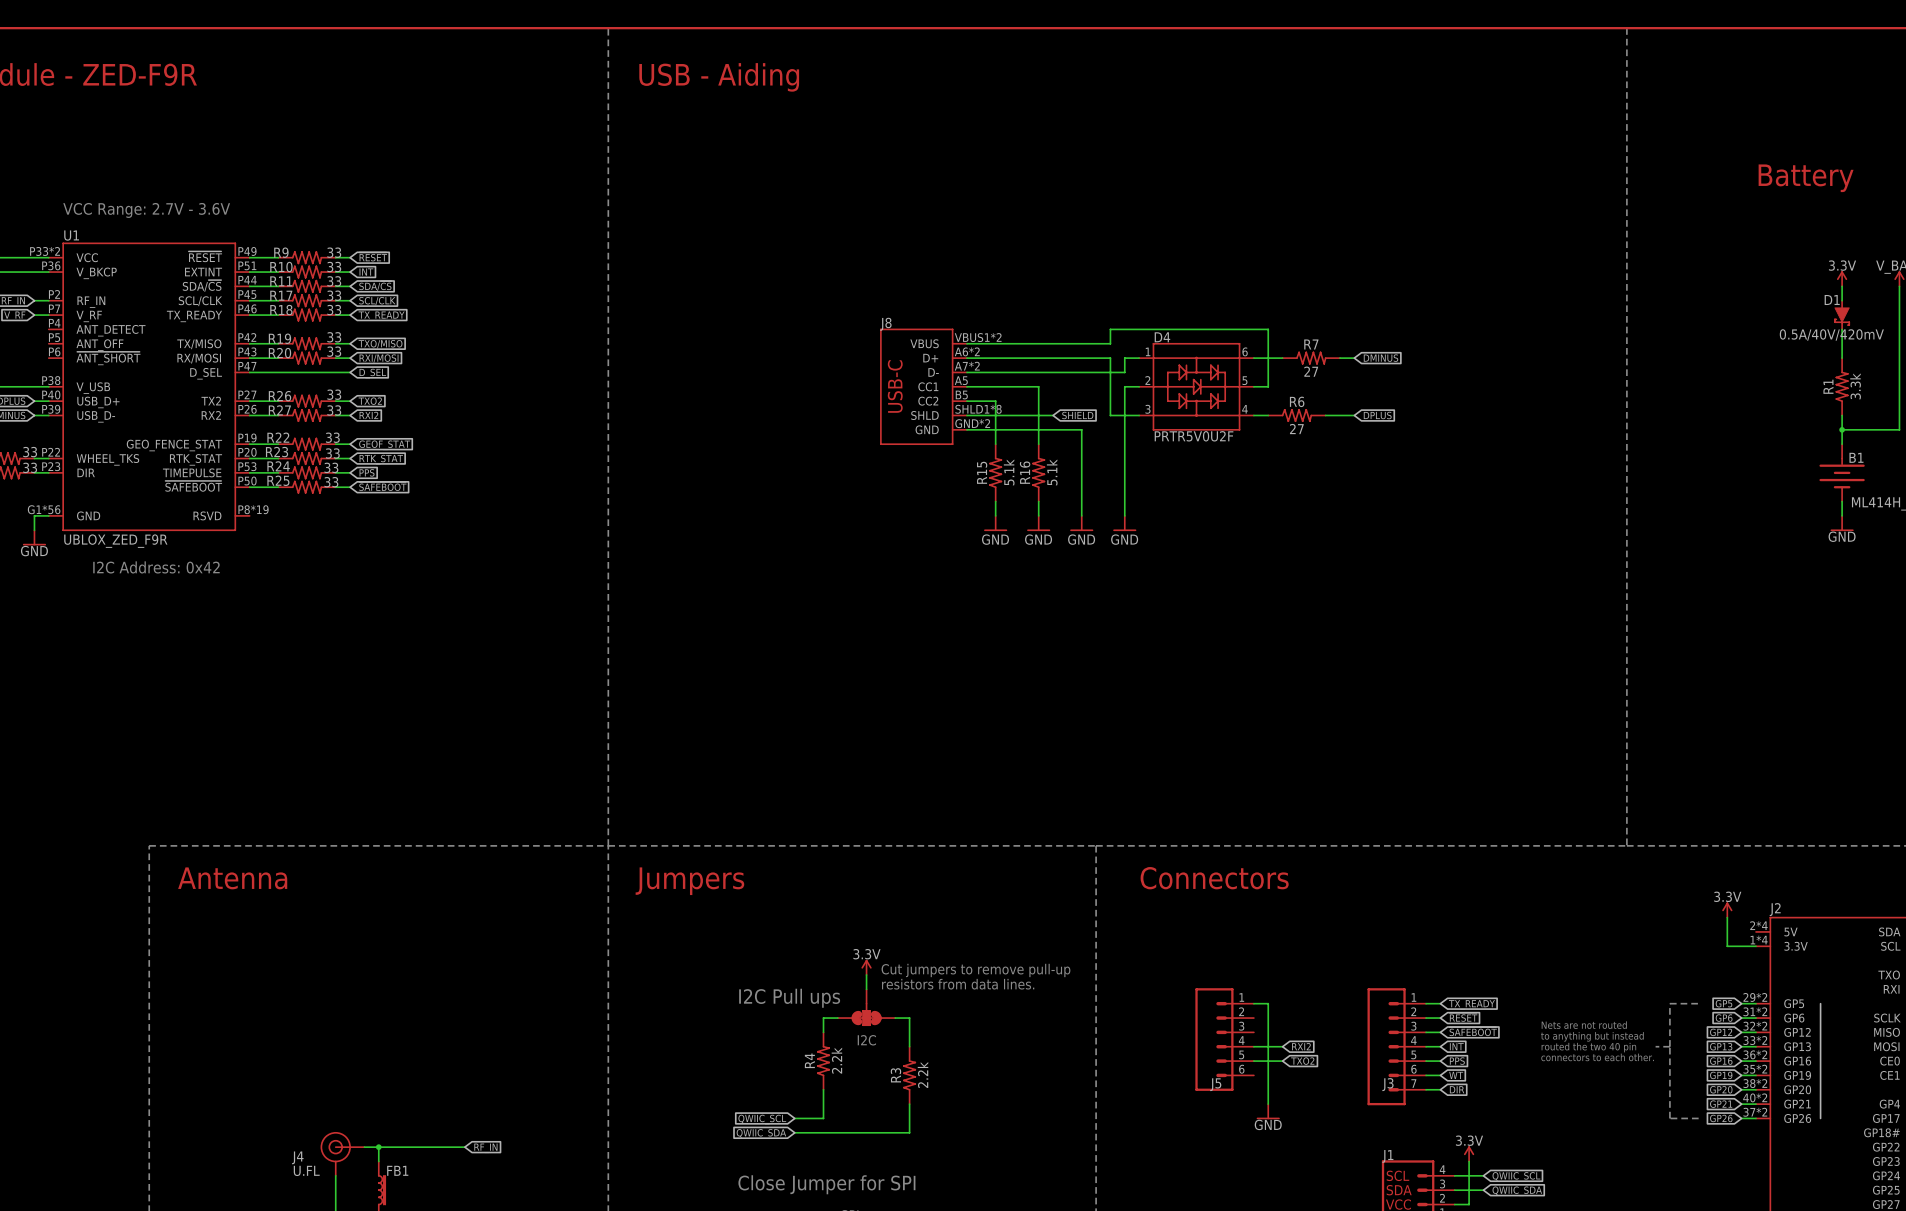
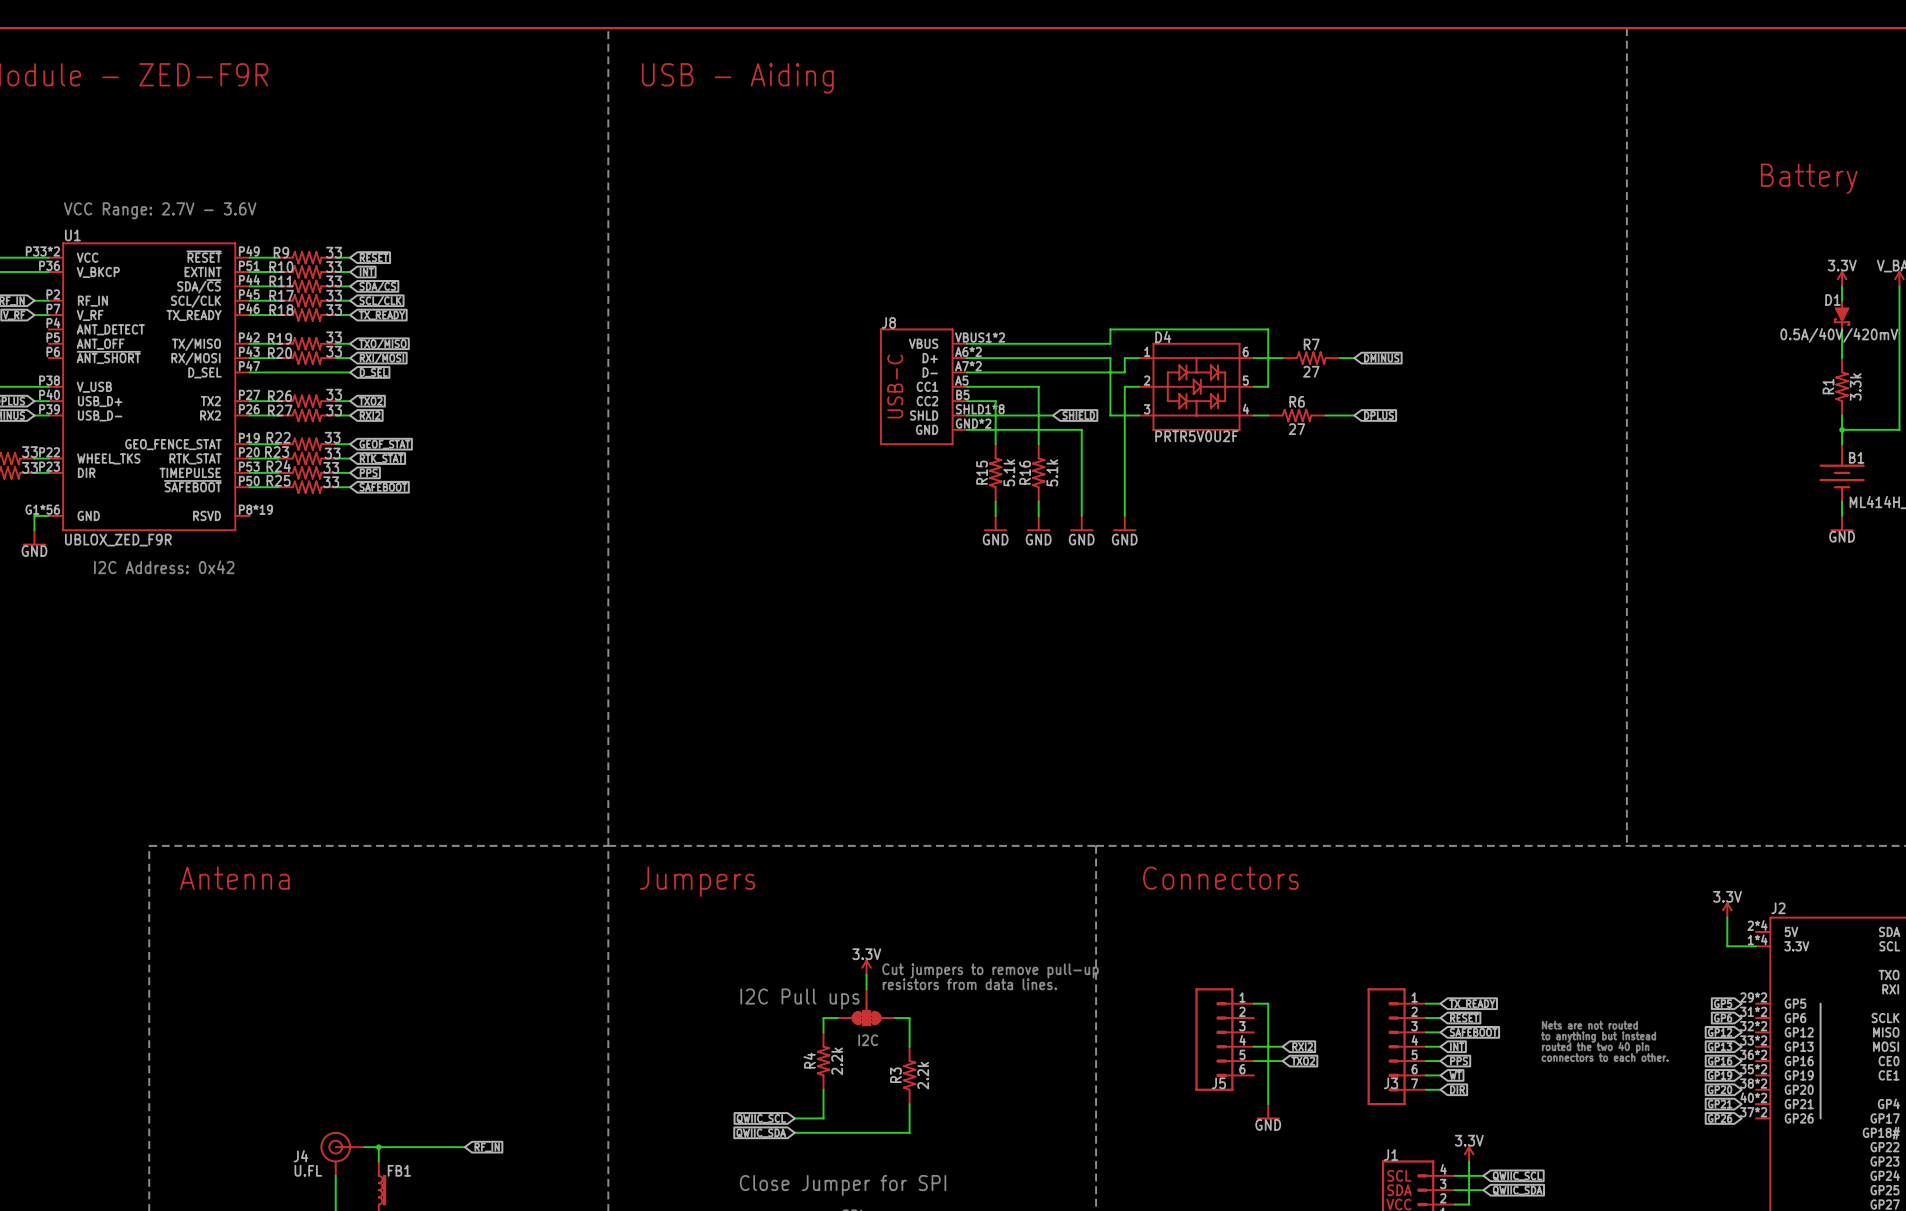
line: (1698, 1003) (1669, 1003) (1669, 1118) (1698, 1118) -> none
wire: (1741, 1003) (1756, 1003) -> none
wire: (1741, 1018) (1756, 1018) -> none
wire: (1741, 1032) (1756, 1032) -> none
line: (1655, 1046) (1669, 1046) -> none
wire: (1741, 1046) (1756, 1046) -> none
wire: (1741, 1061) (1756, 1061) -> none
wire: (1741, 1075) (1756, 1075) -> none
wire: (1741, 1089) (1756, 1089) -> none
wire: (1741, 1104) (1756, 1104) -> none
wire: (1741, 1118) (1756, 1118) -> none

